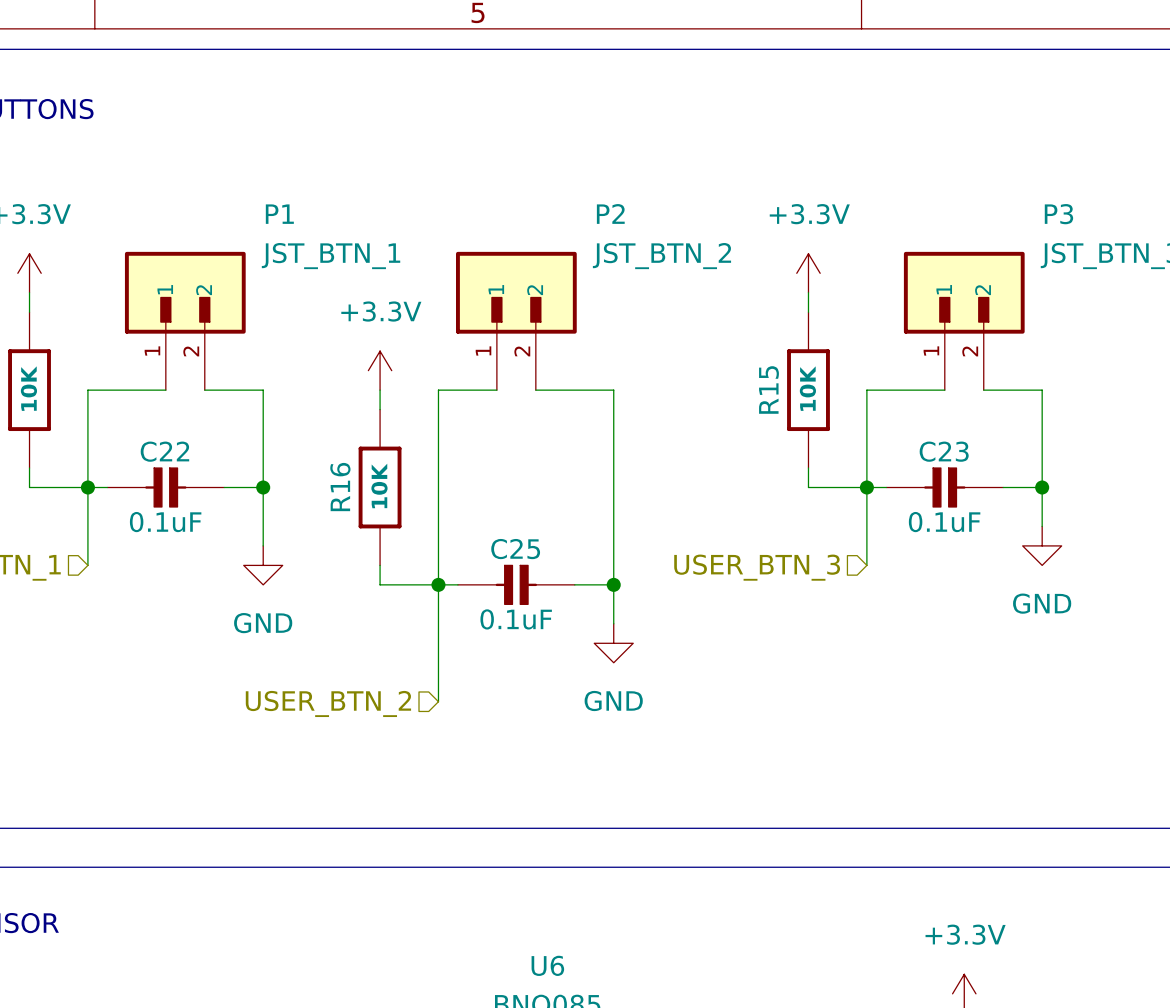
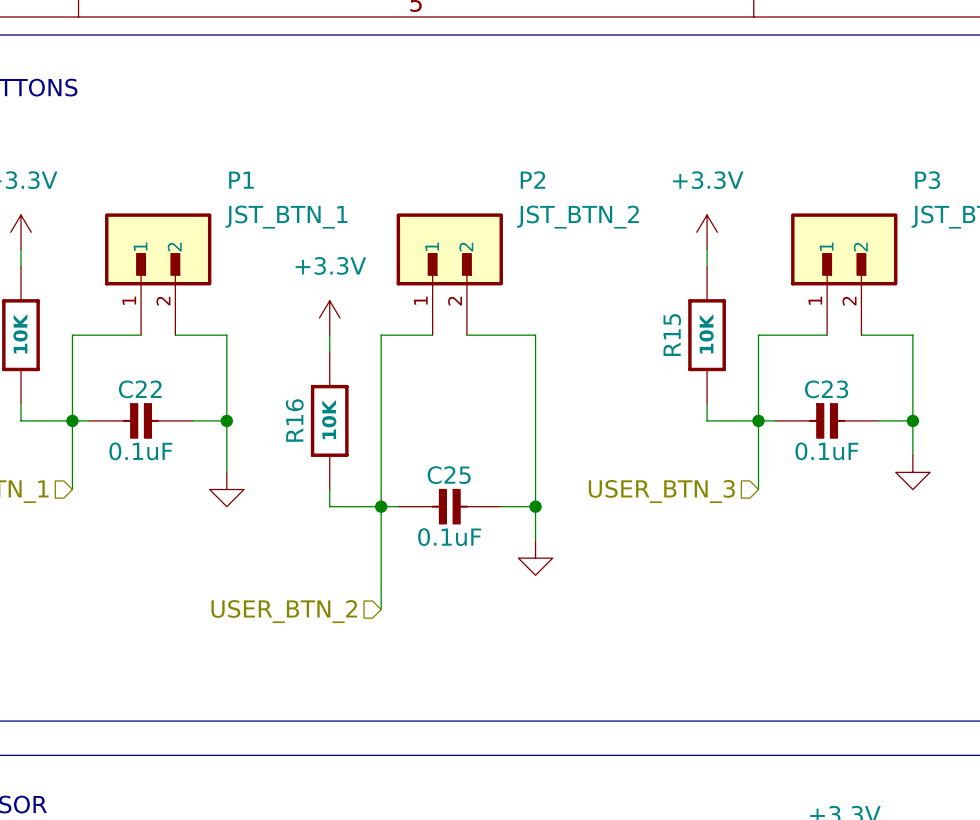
power symbol text: GND (1042, 603) -> none
power symbol text: GND (263, 623) -> none
power symbol text: GND (613, 701) -> none

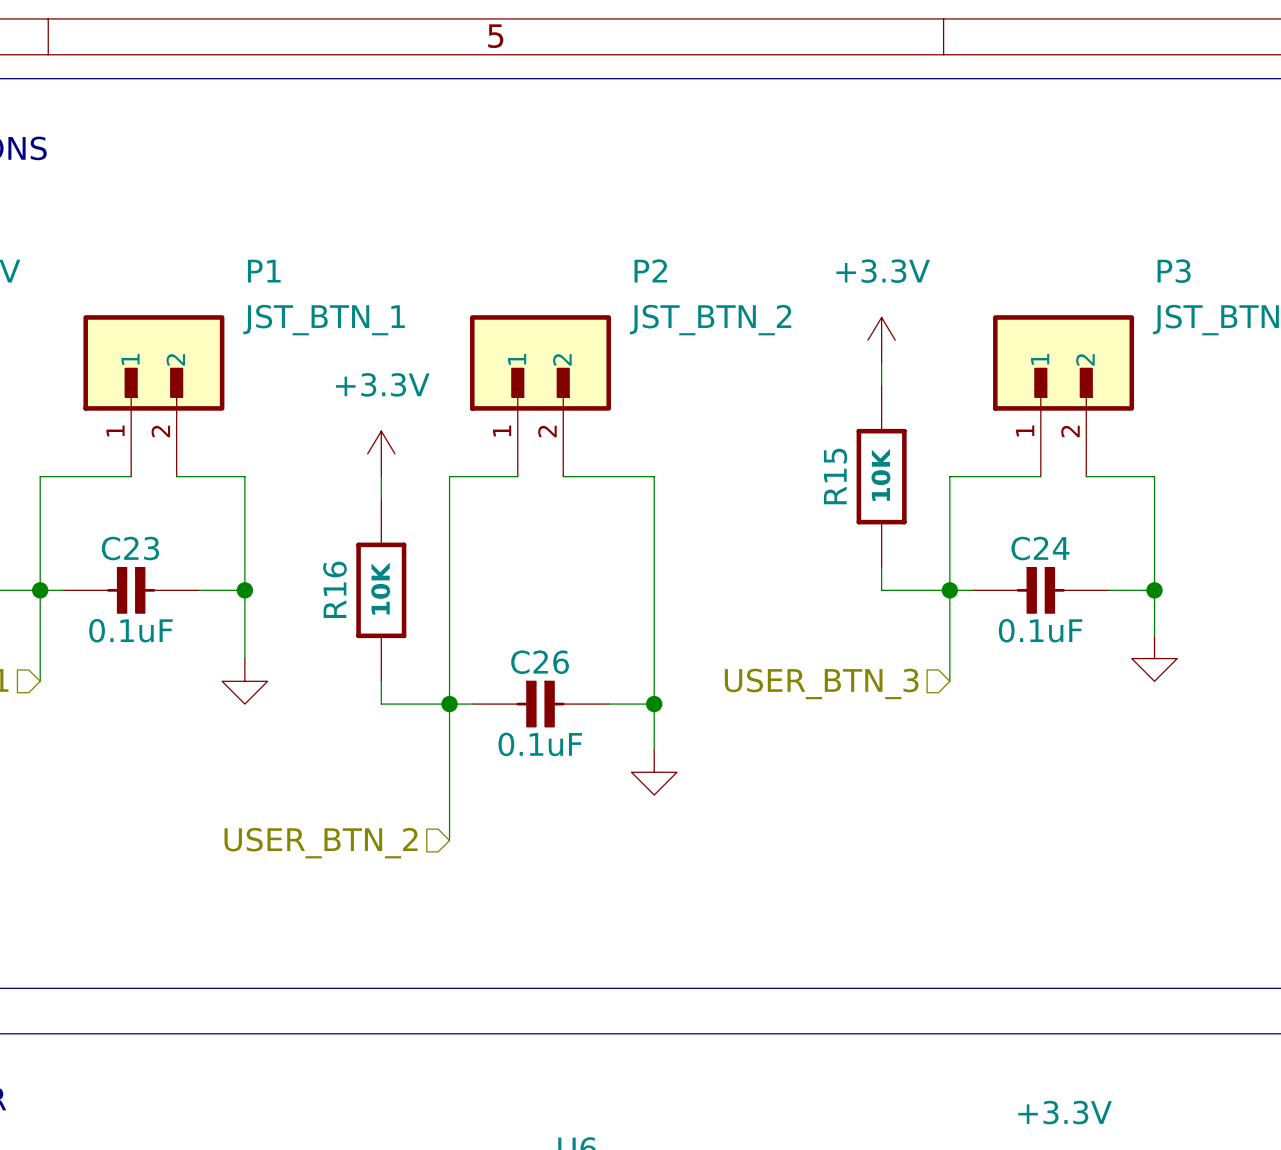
C22 name: C22 (140, 389) -> C23 (130, 548)
C23 name: C23 (826, 389) -> C24 (1040, 548)
C25 name: C25 (449, 475) -> C26 (540, 662)

